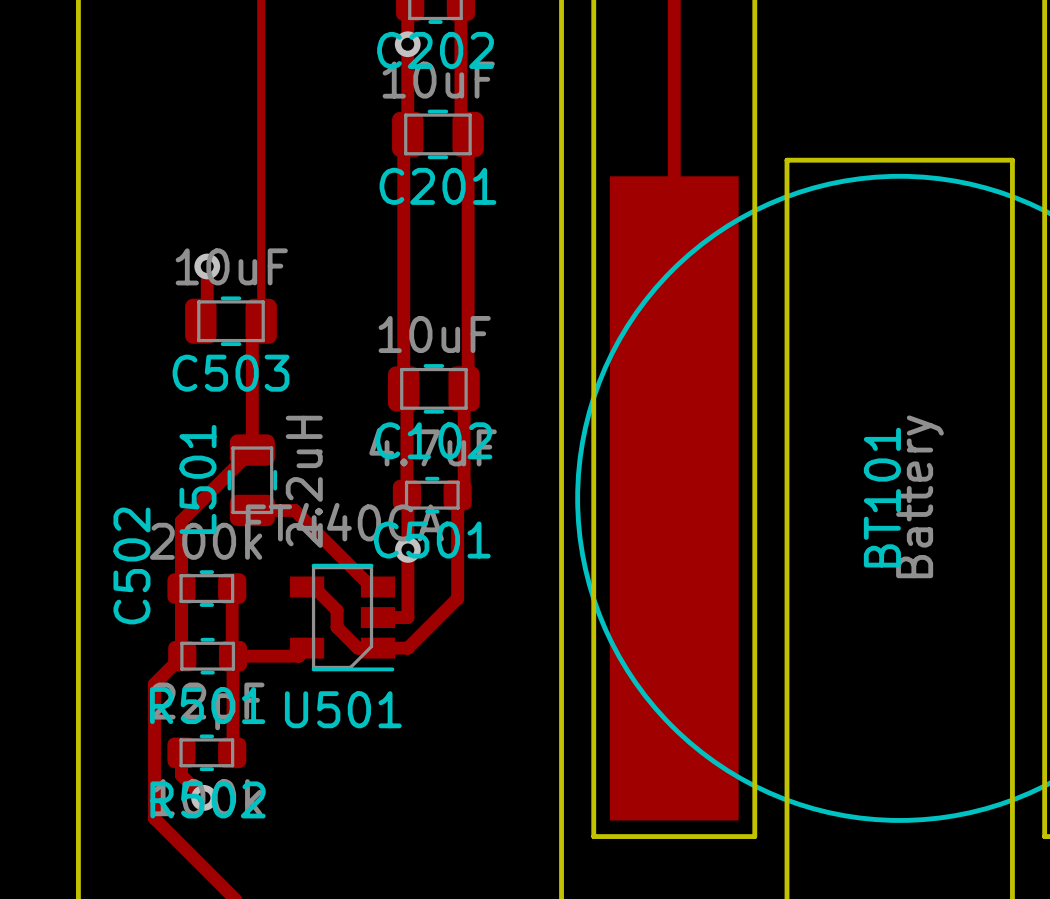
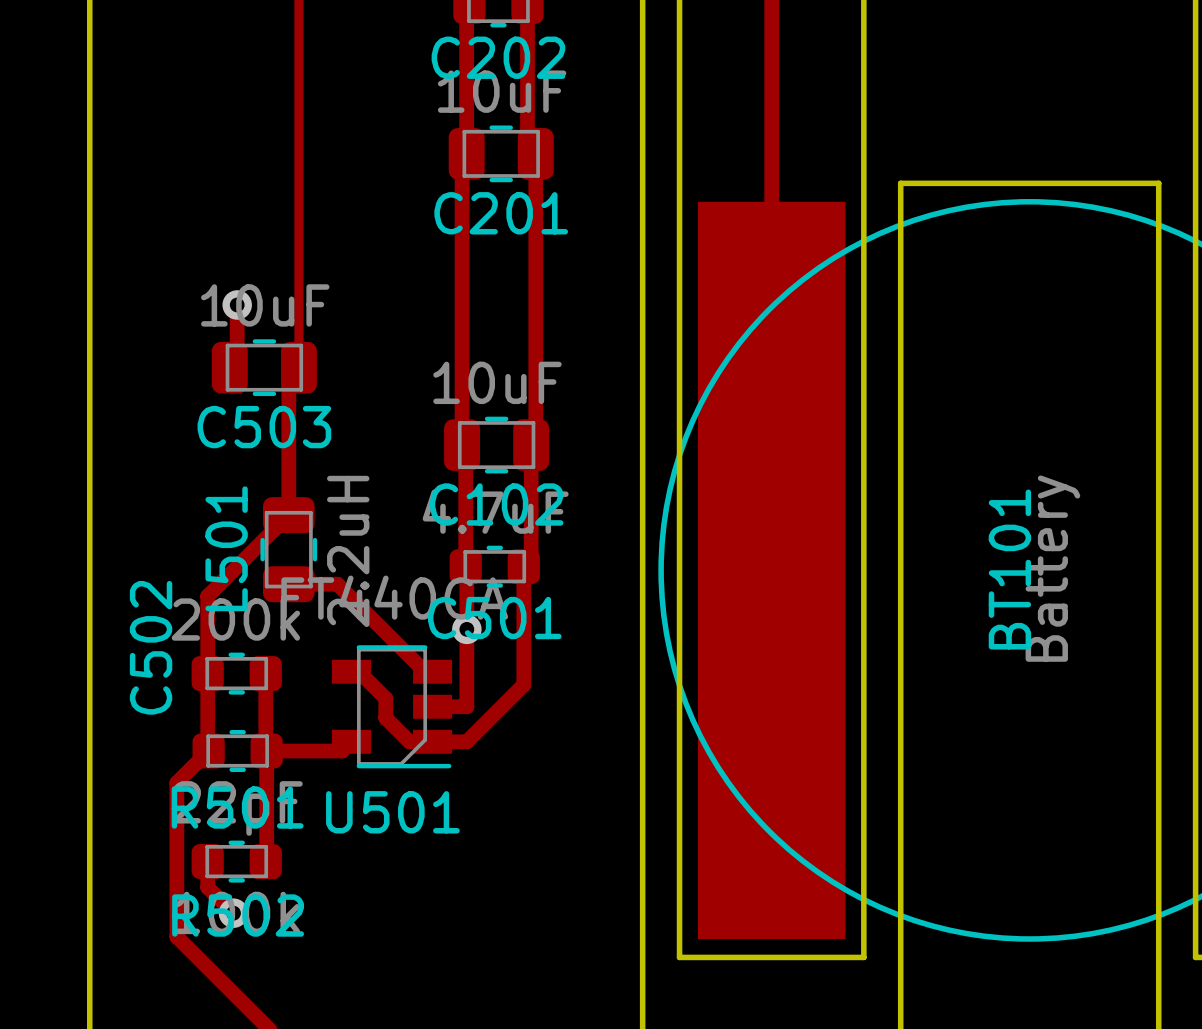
via: (407, 44) -> none

